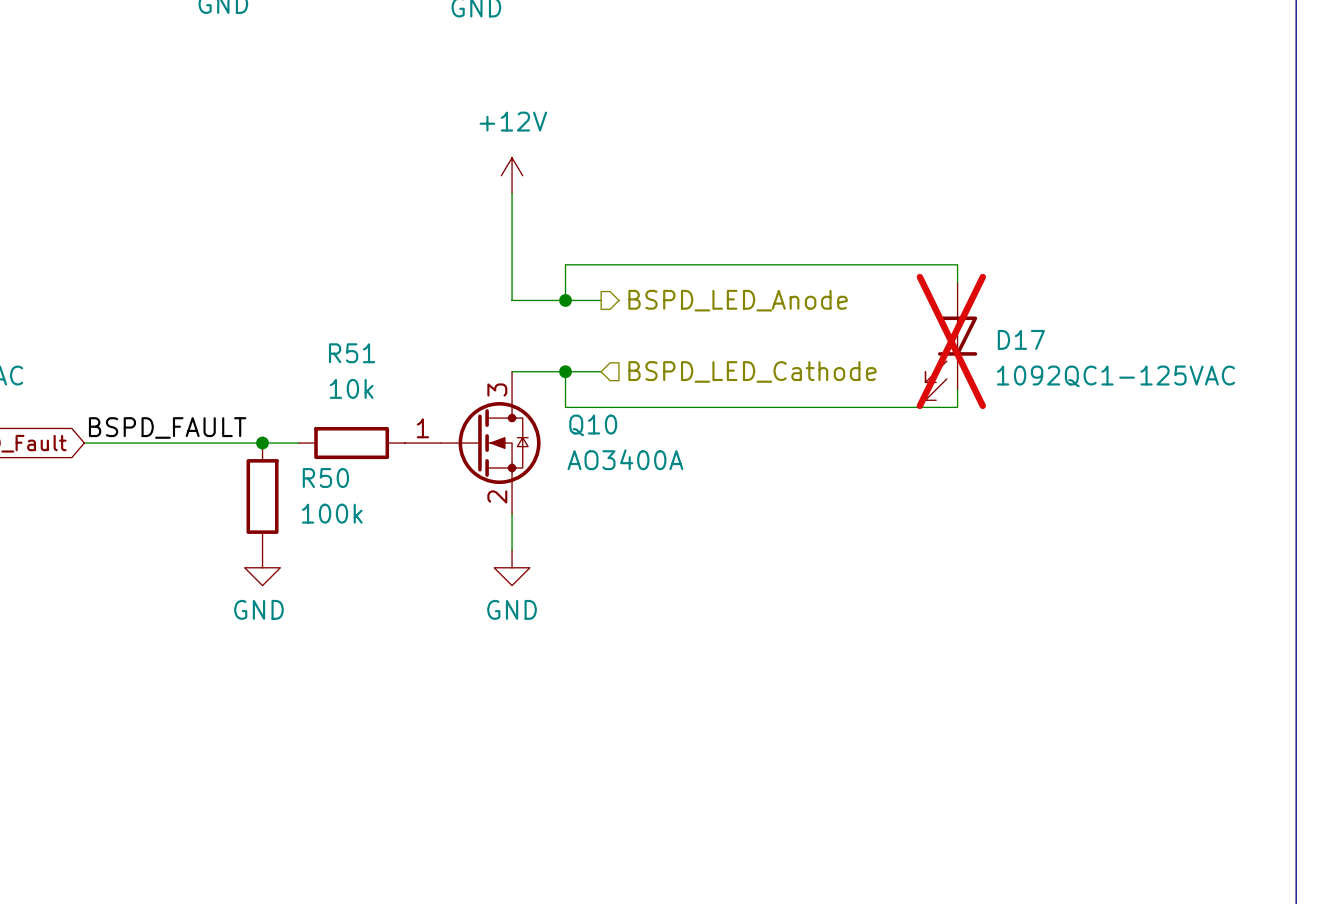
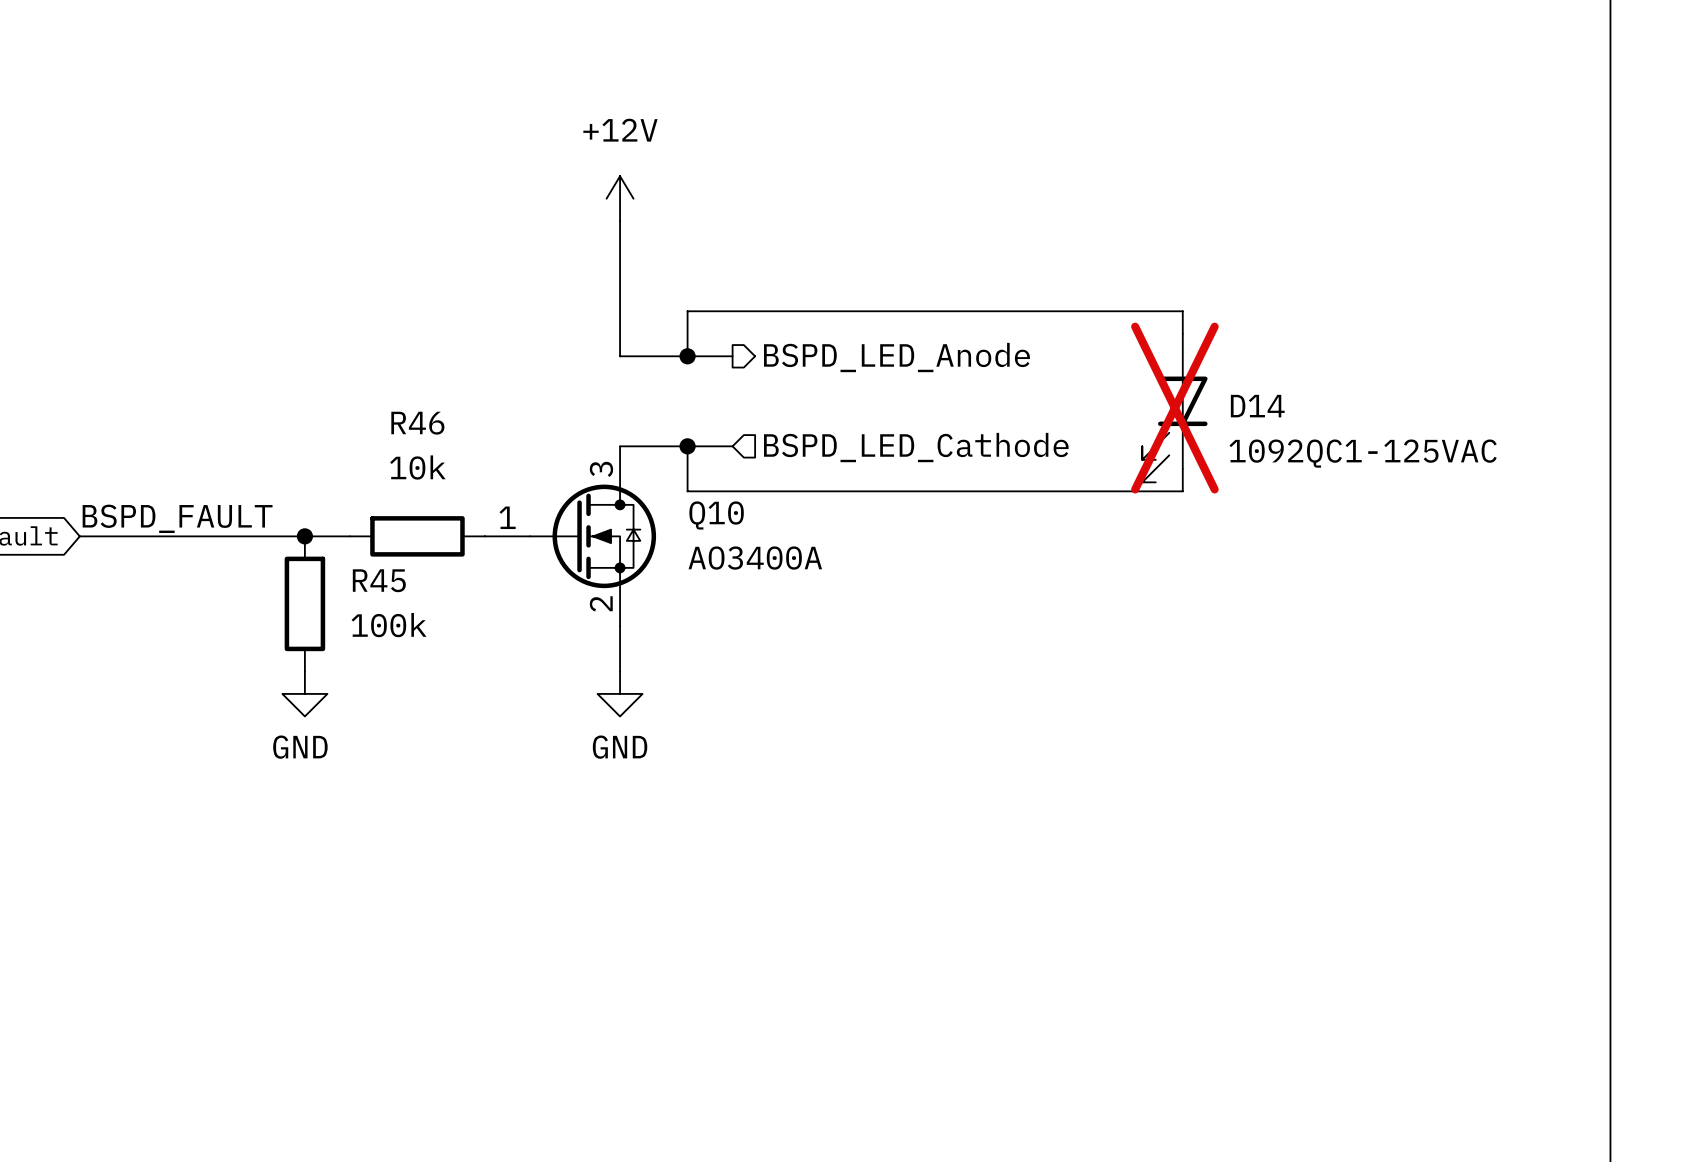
D17 name: D17 (1021, 339) -> D14 (1257, 406)
R51 name: R51 (352, 353) -> R46 (417, 423)
R50 name: R50 (325, 478) -> R45 (379, 580)

